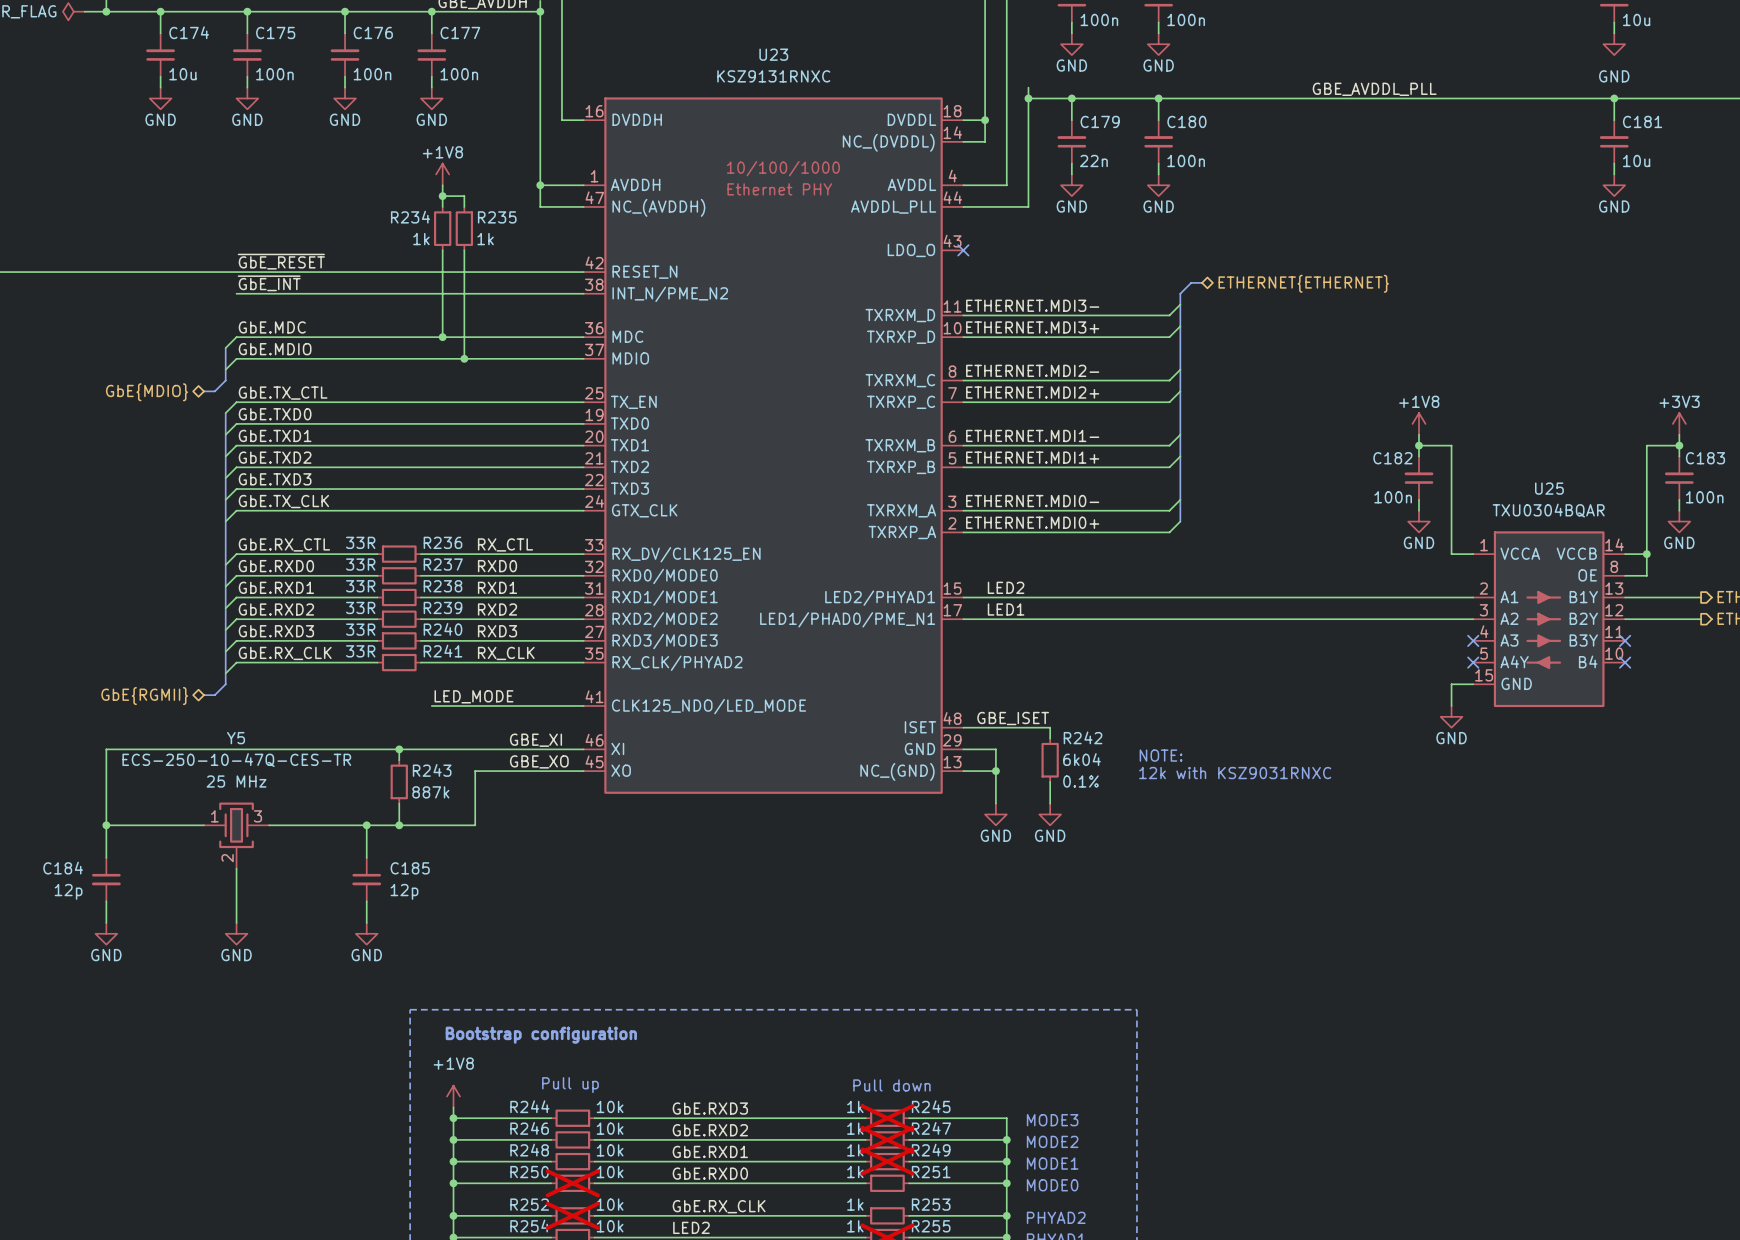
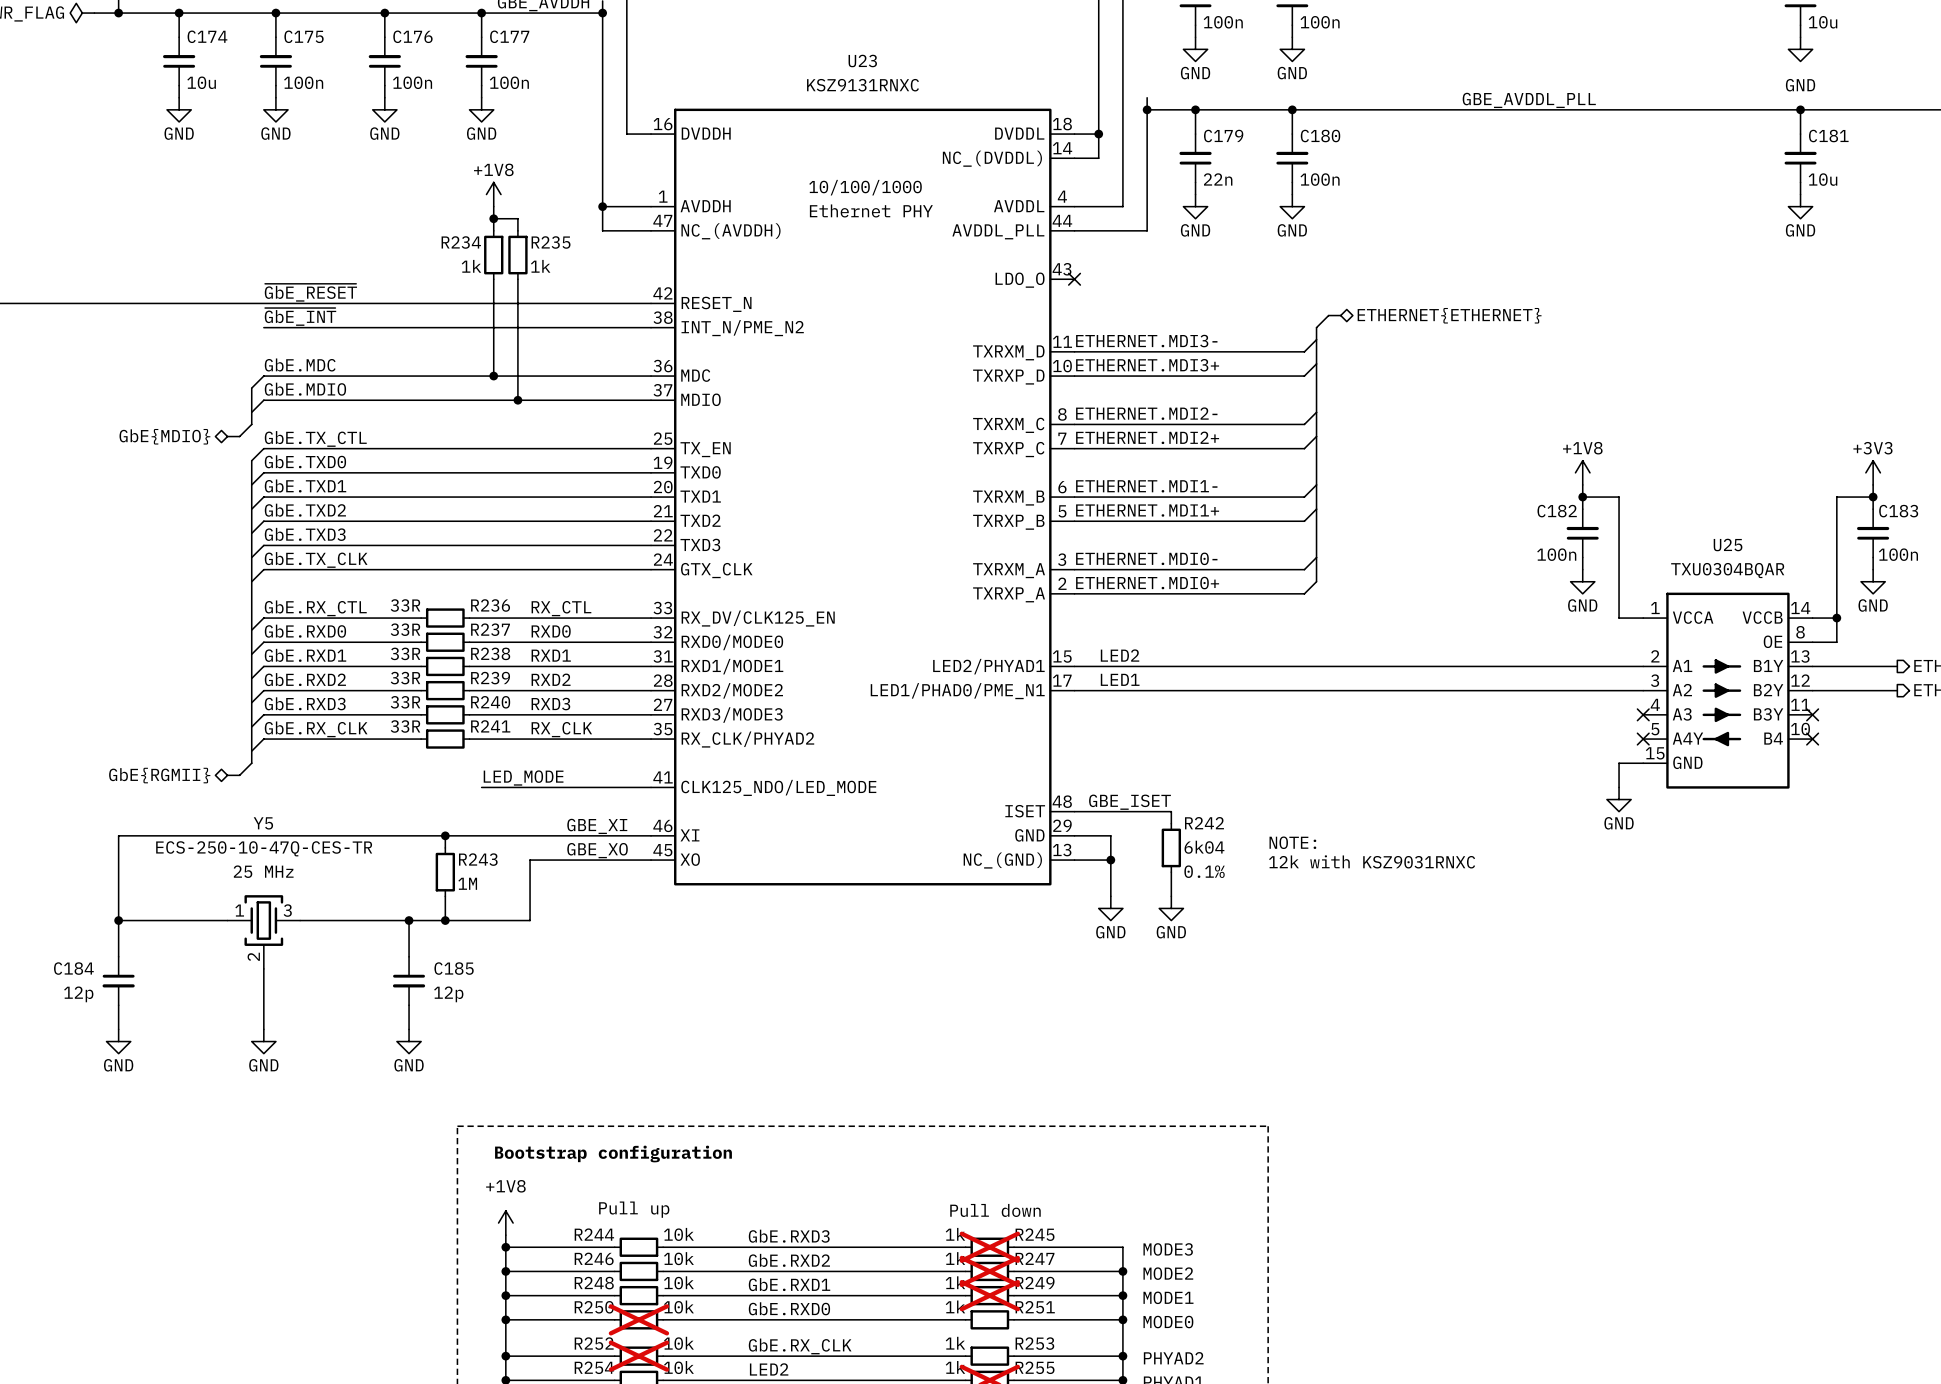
R243 text: 887k (430, 792) -> 1M (467, 883)

